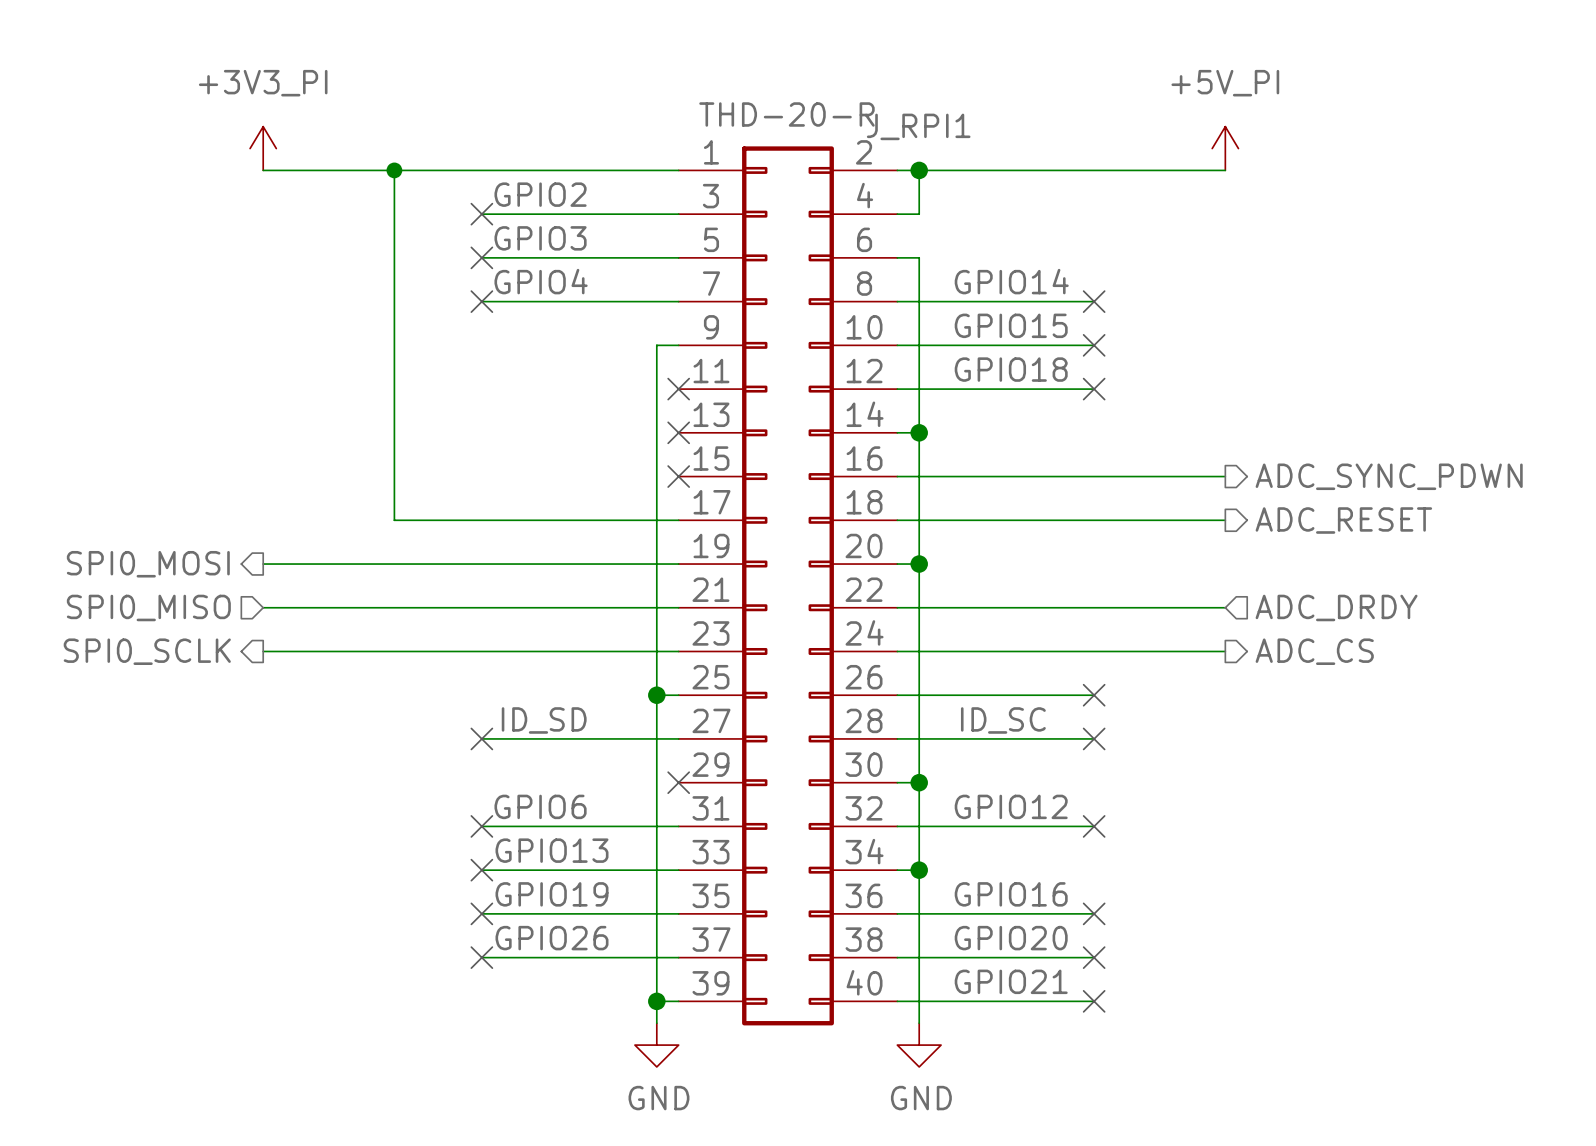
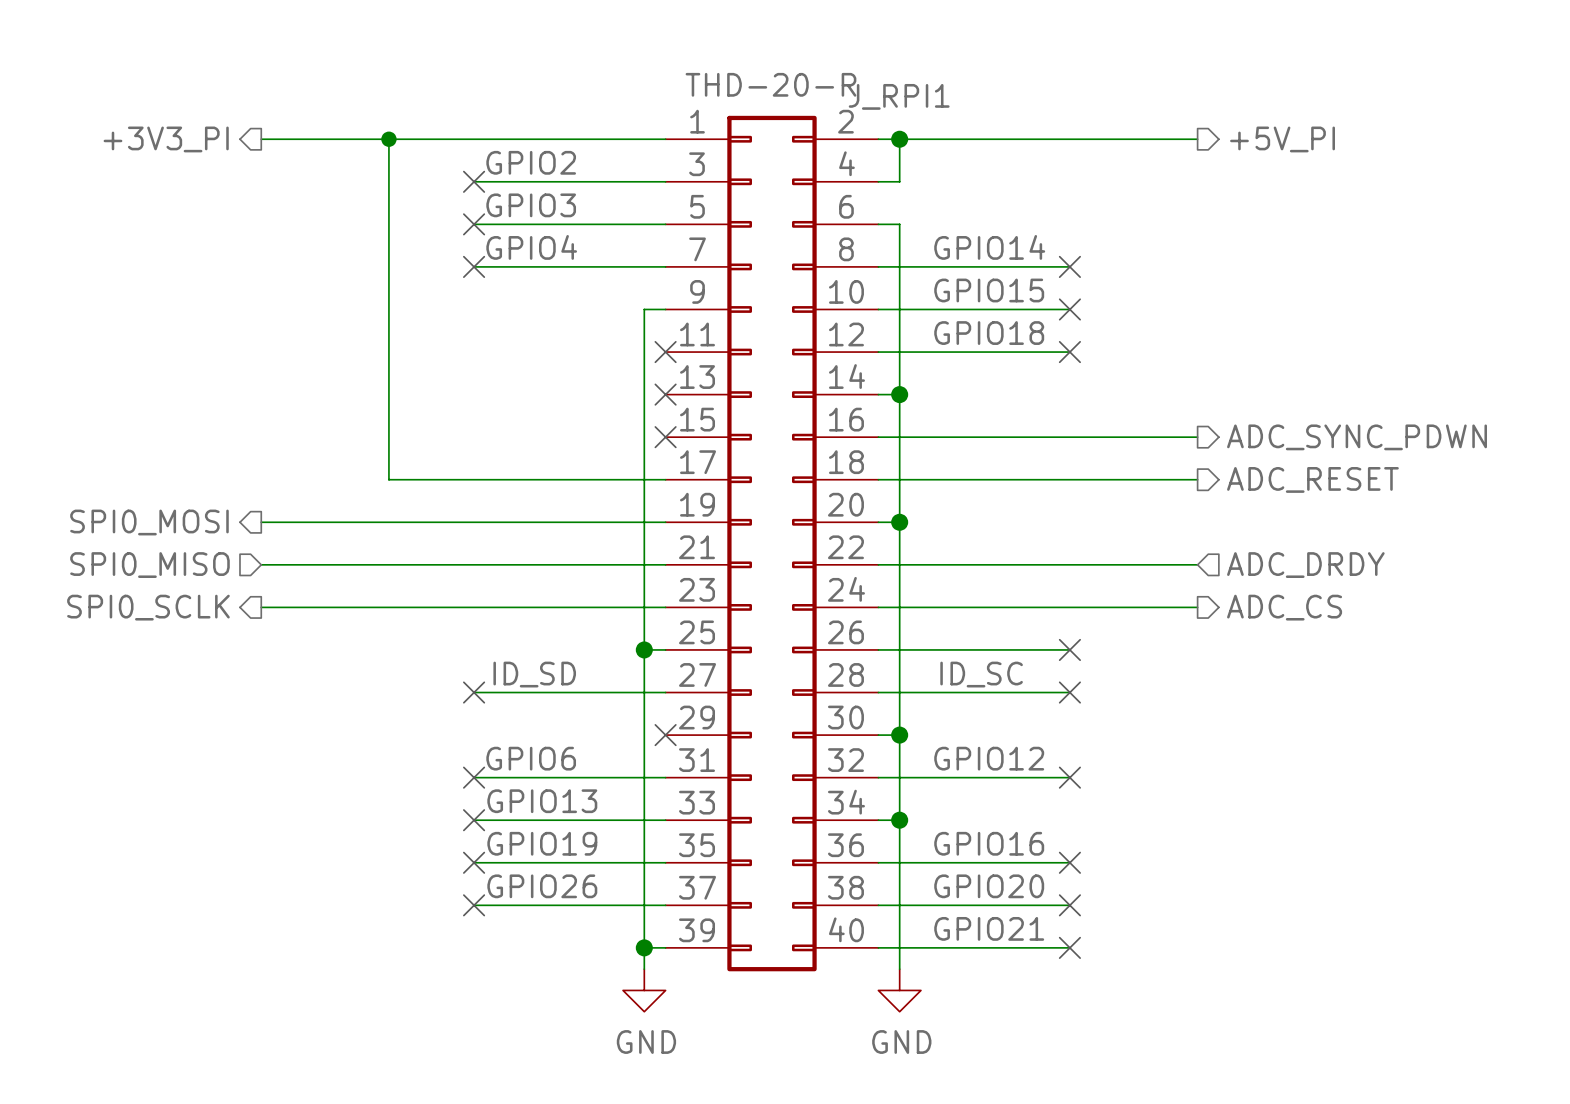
power symbol: +3V3_PI (263, 148) -> none
power symbol: +5V_PI (1225, 148) -> none
hierarchical label: none -> +3V3_PI (166, 139)
hierarchical label: none -> +5V_PI (1282, 139)

